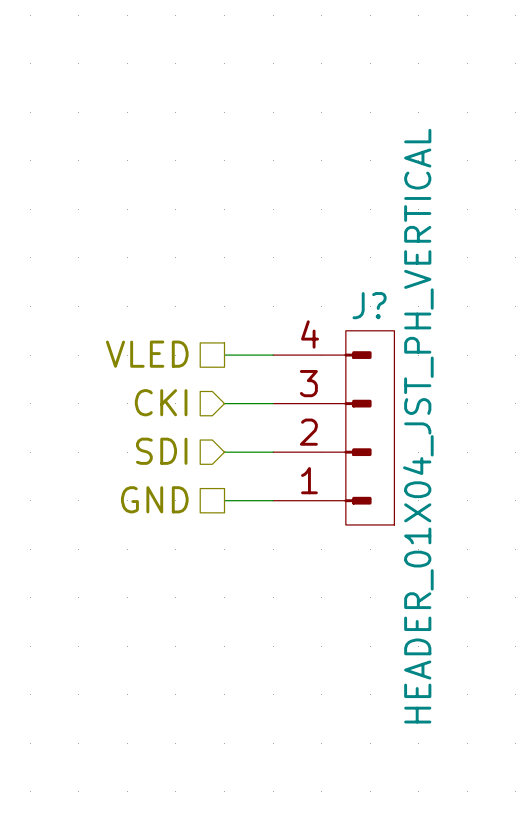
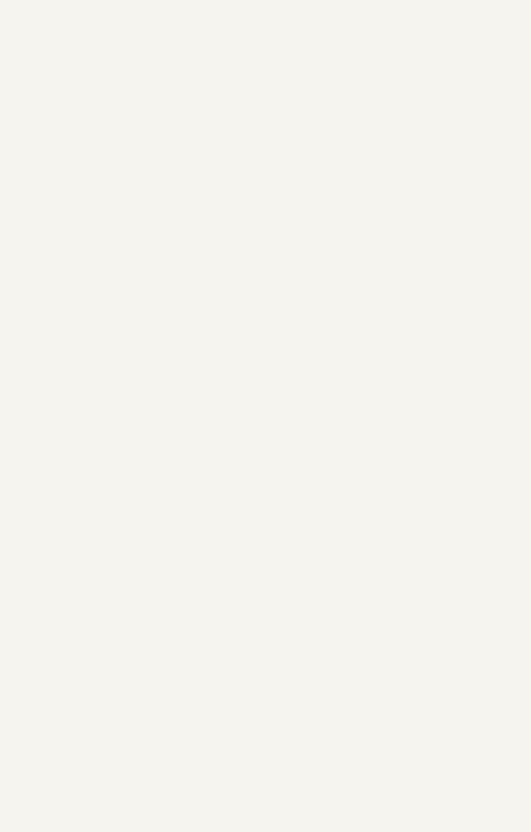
hierarchical label: VLED (147, 354) -> none
wire: (224, 355) (273, 355) -> none
hierarchical label: CKI (161, 402) -> none
wire: (224, 403) (273, 403) -> none
J?: HEADER_01X04_JST_PH_VERTICAL (333, 427) -> none
hierarchical label: SDI (161, 451) -> none
wire: (224, 452) (273, 452) -> none
hierarchical label: GND (154, 499) -> none
wire: (224, 500) (273, 500) -> none

